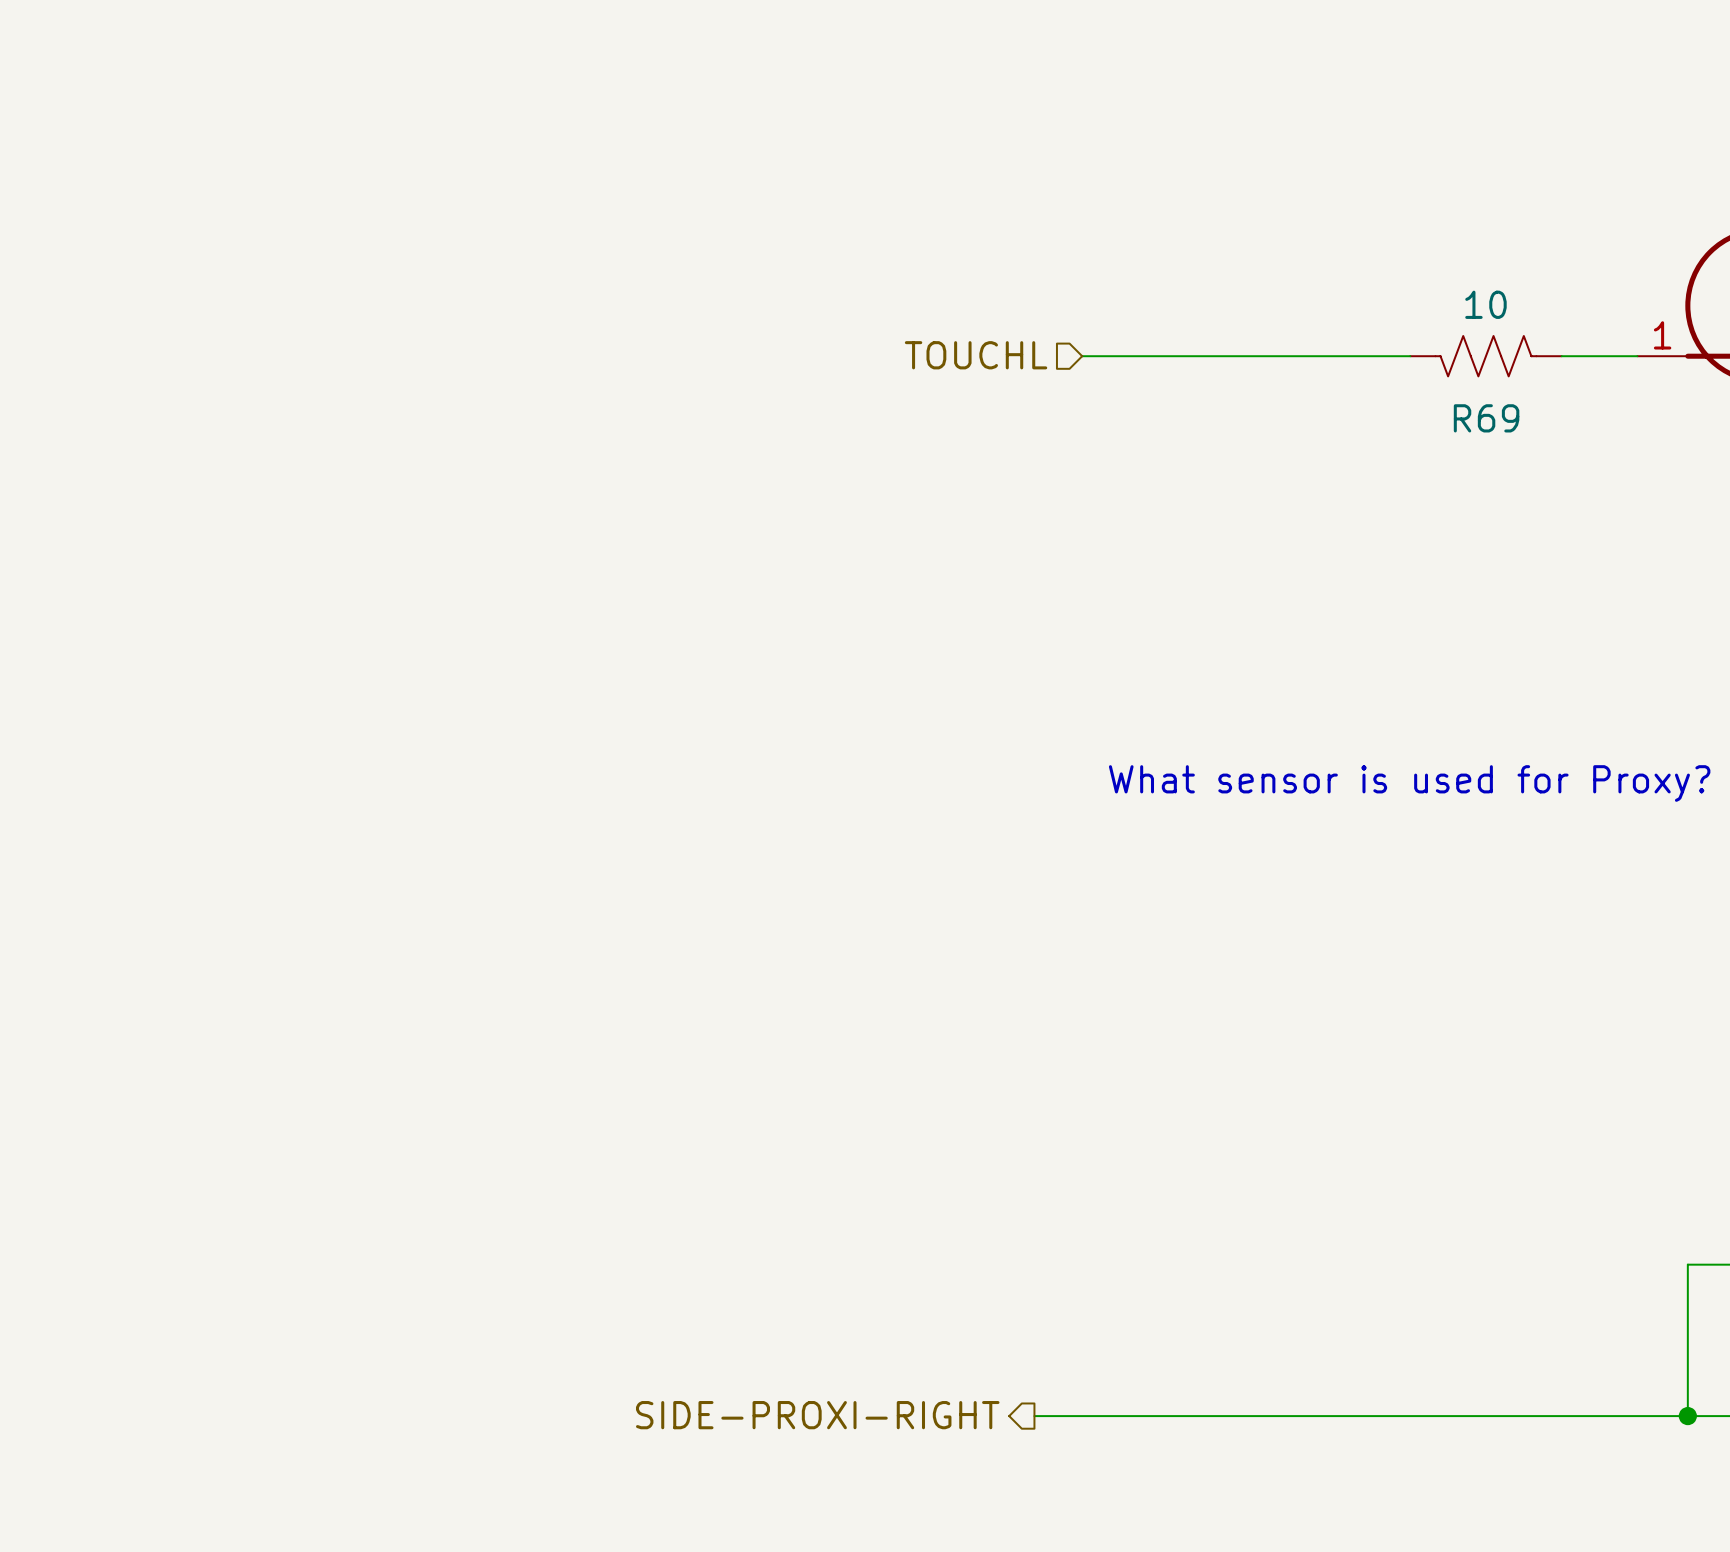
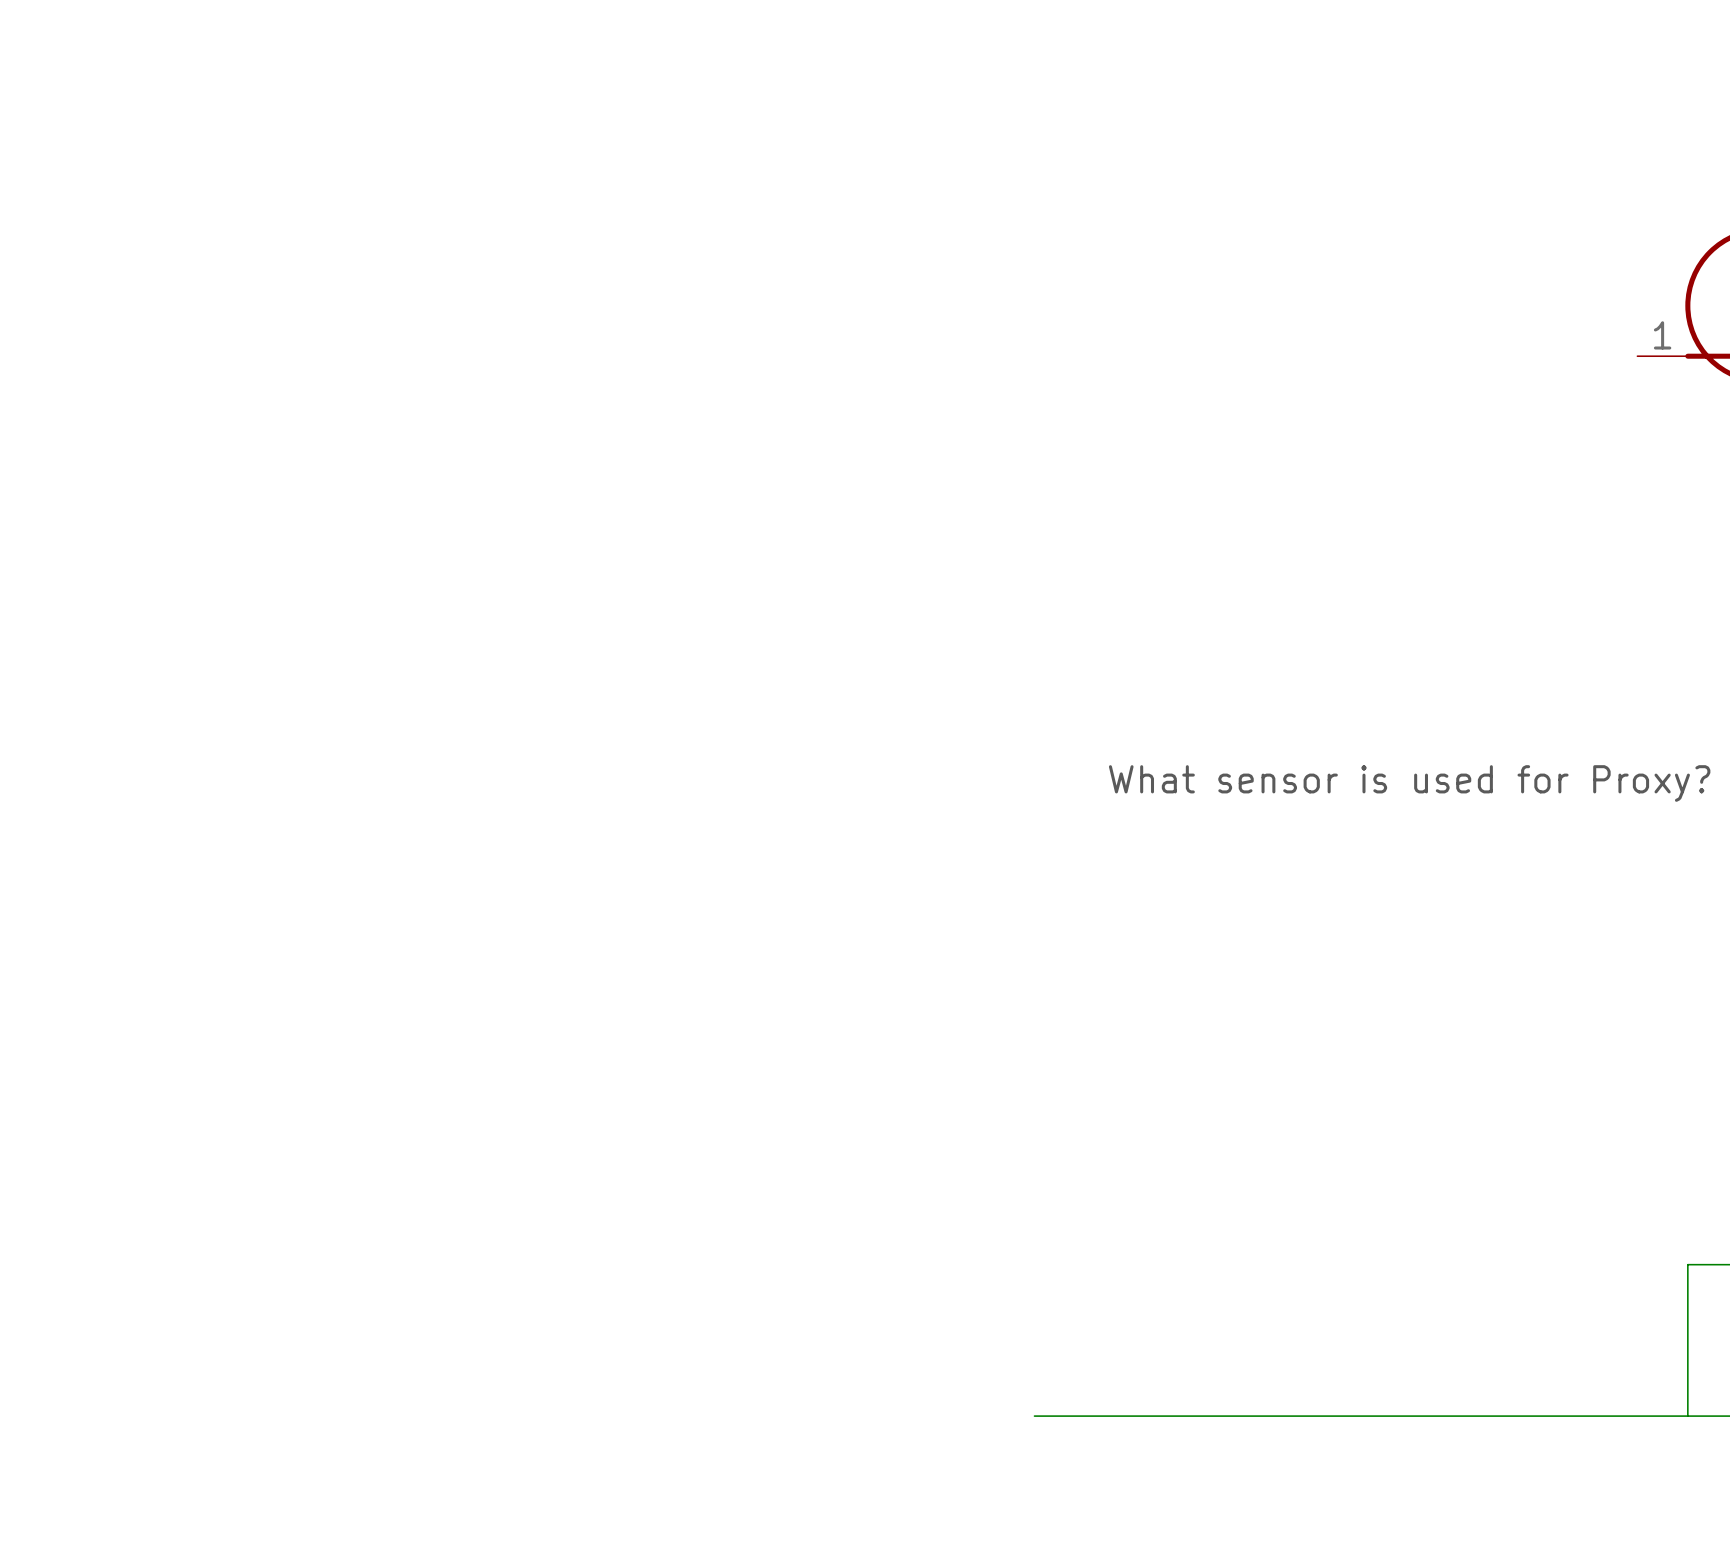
hierarchical label: TOUCHL (976, 355) -> none
wire: (1082, 356) (1410, 356) -> none
R69: 10 (1485, 356) -> none
wire: (1561, 356) (1637, 356) -> none
hierarchical label: SIDE-PROXI-RIGHT (817, 1415) -> none
junction: (1687, 1416) -> none

